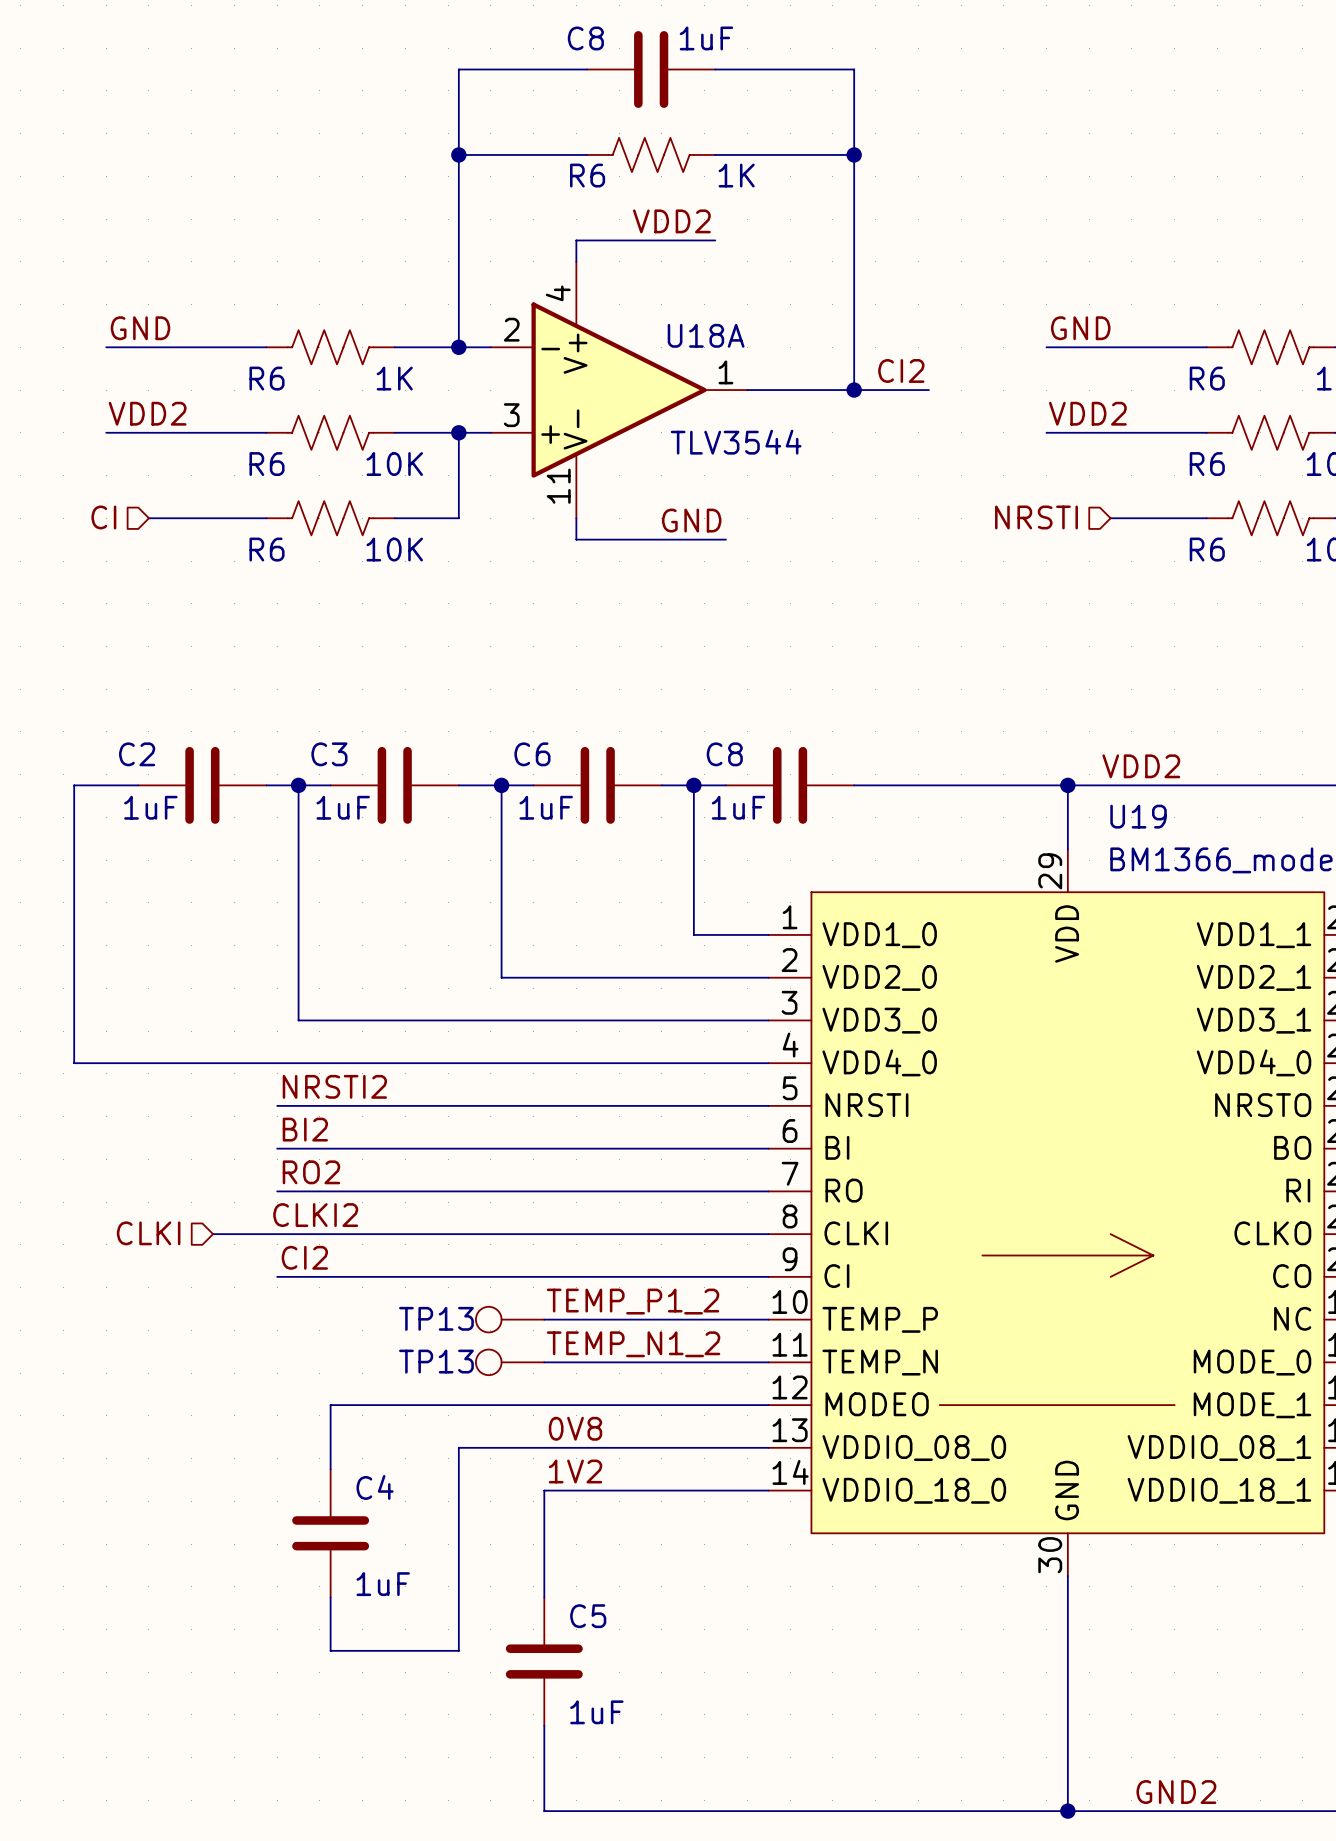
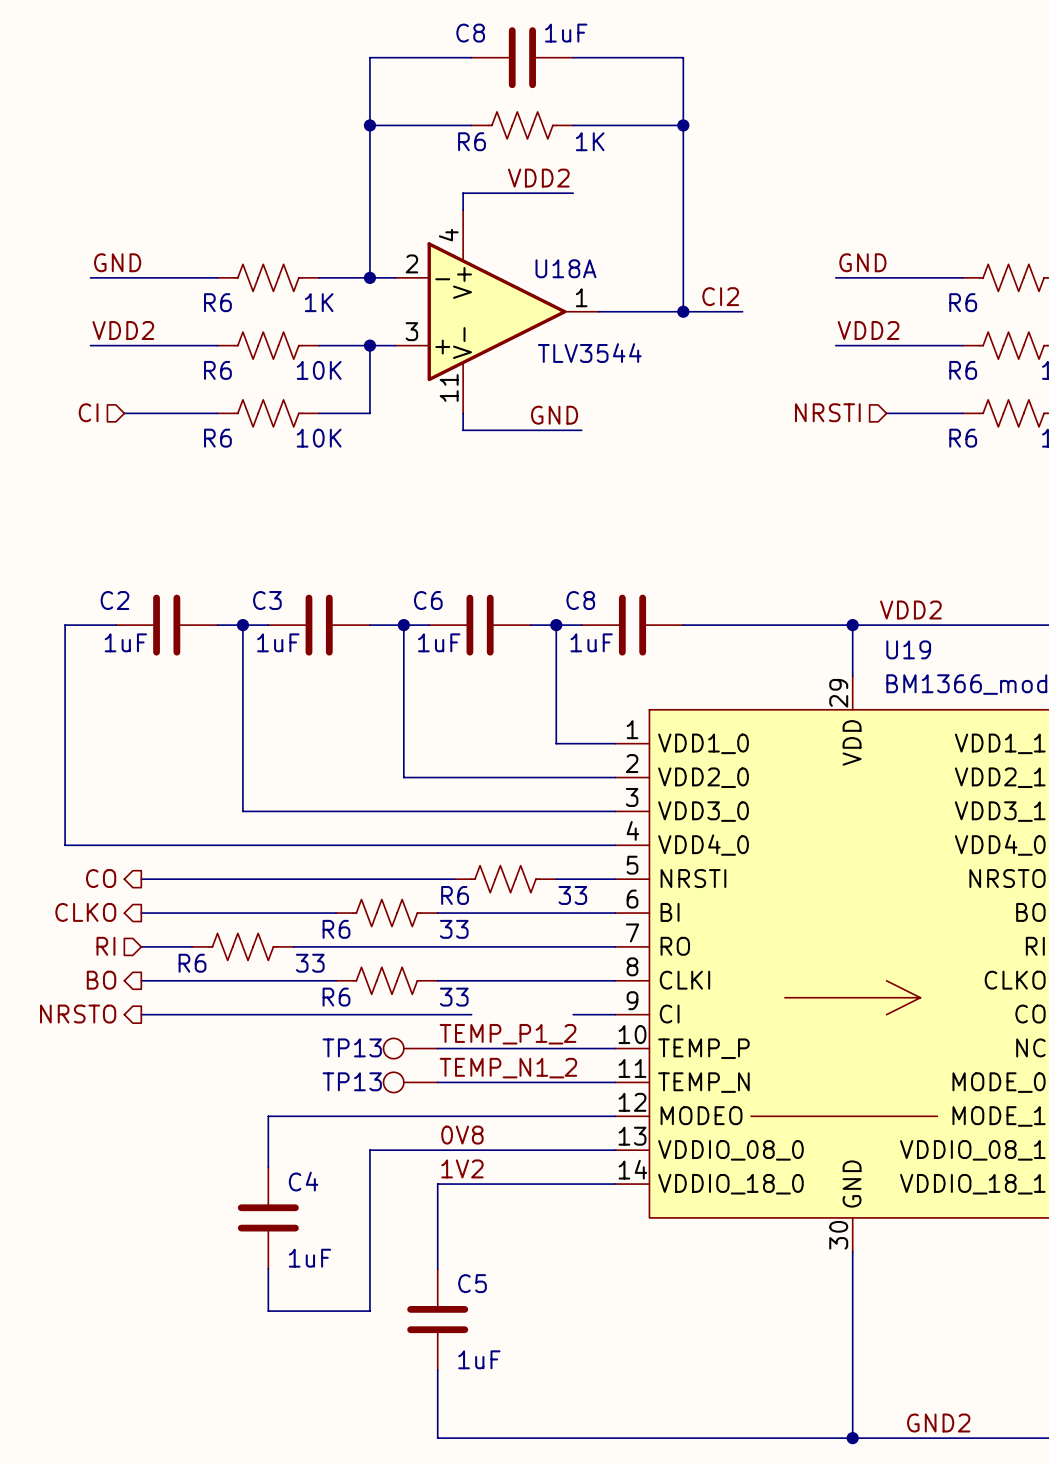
label: NRSTI2 (334, 1086) -> none
hierarchical label: none -> CO (101, 878)
wire: none -> (141, 879) (225, 879)
wire: (565, 1105) (693, 1105) -> none
R6: none -> 33 (505, 879)
label: BI2 (305, 1129) -> none
hierarchical label: none -> CLKO (85, 912)
wire: none -> (141, 913) (225, 913)
wire: (416, 1148) (544, 1148) -> none
R6: none -> 33 (386, 913)
label: RO2 (311, 1172) -> none
hierarchical label: none -> RI (105, 946)
wire: none -> (141, 946) (192, 946)
wire: (277, 1191) (362, 1191) -> none
R6: none -> 33 (242, 946)
label: CLKI2 (315, 1215) -> none
hierarchical label: none -> BO (101, 980)
hierarchical label: CLKI (148, 1233) -> none
wire: none -> (141, 980) (175, 980)
wire: (416, 1234) (544, 1234) -> none
R6: none -> 33 (386, 980)
label: CI2 (304, 1257) -> none
hierarchical label: none -> NRSTO (78, 1014)
wire: none -> (141, 1014) (225, 1014)
wire: (587, 1276) (715, 1276) -> none

